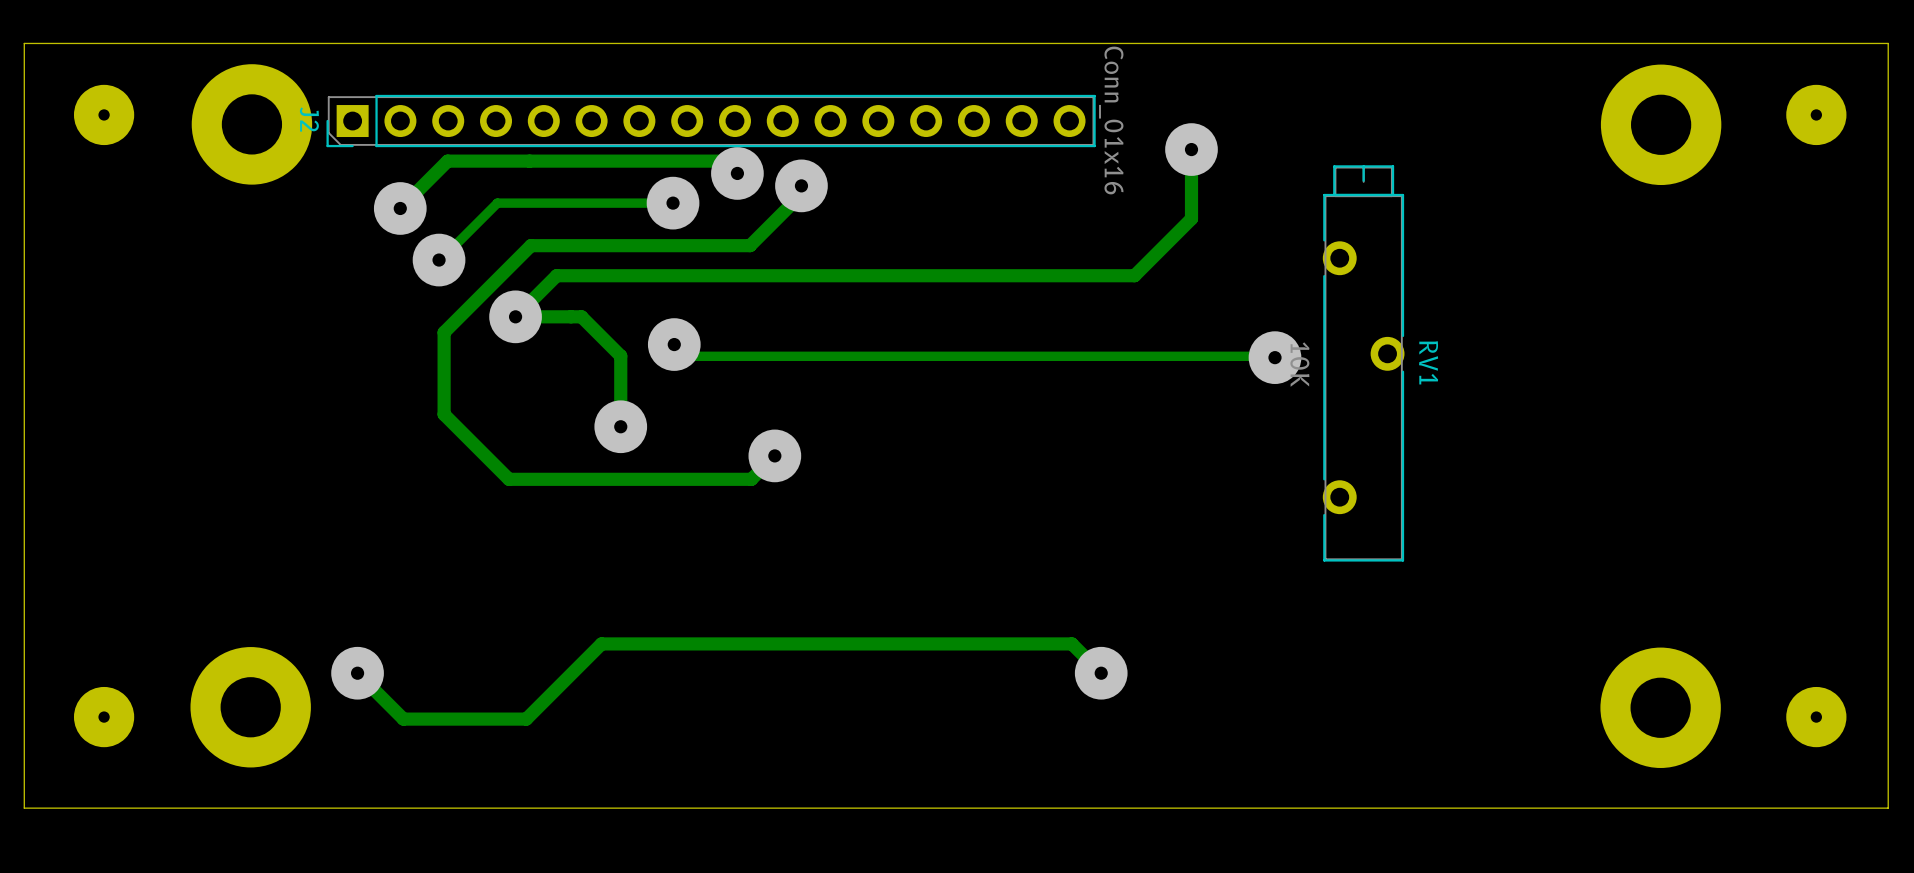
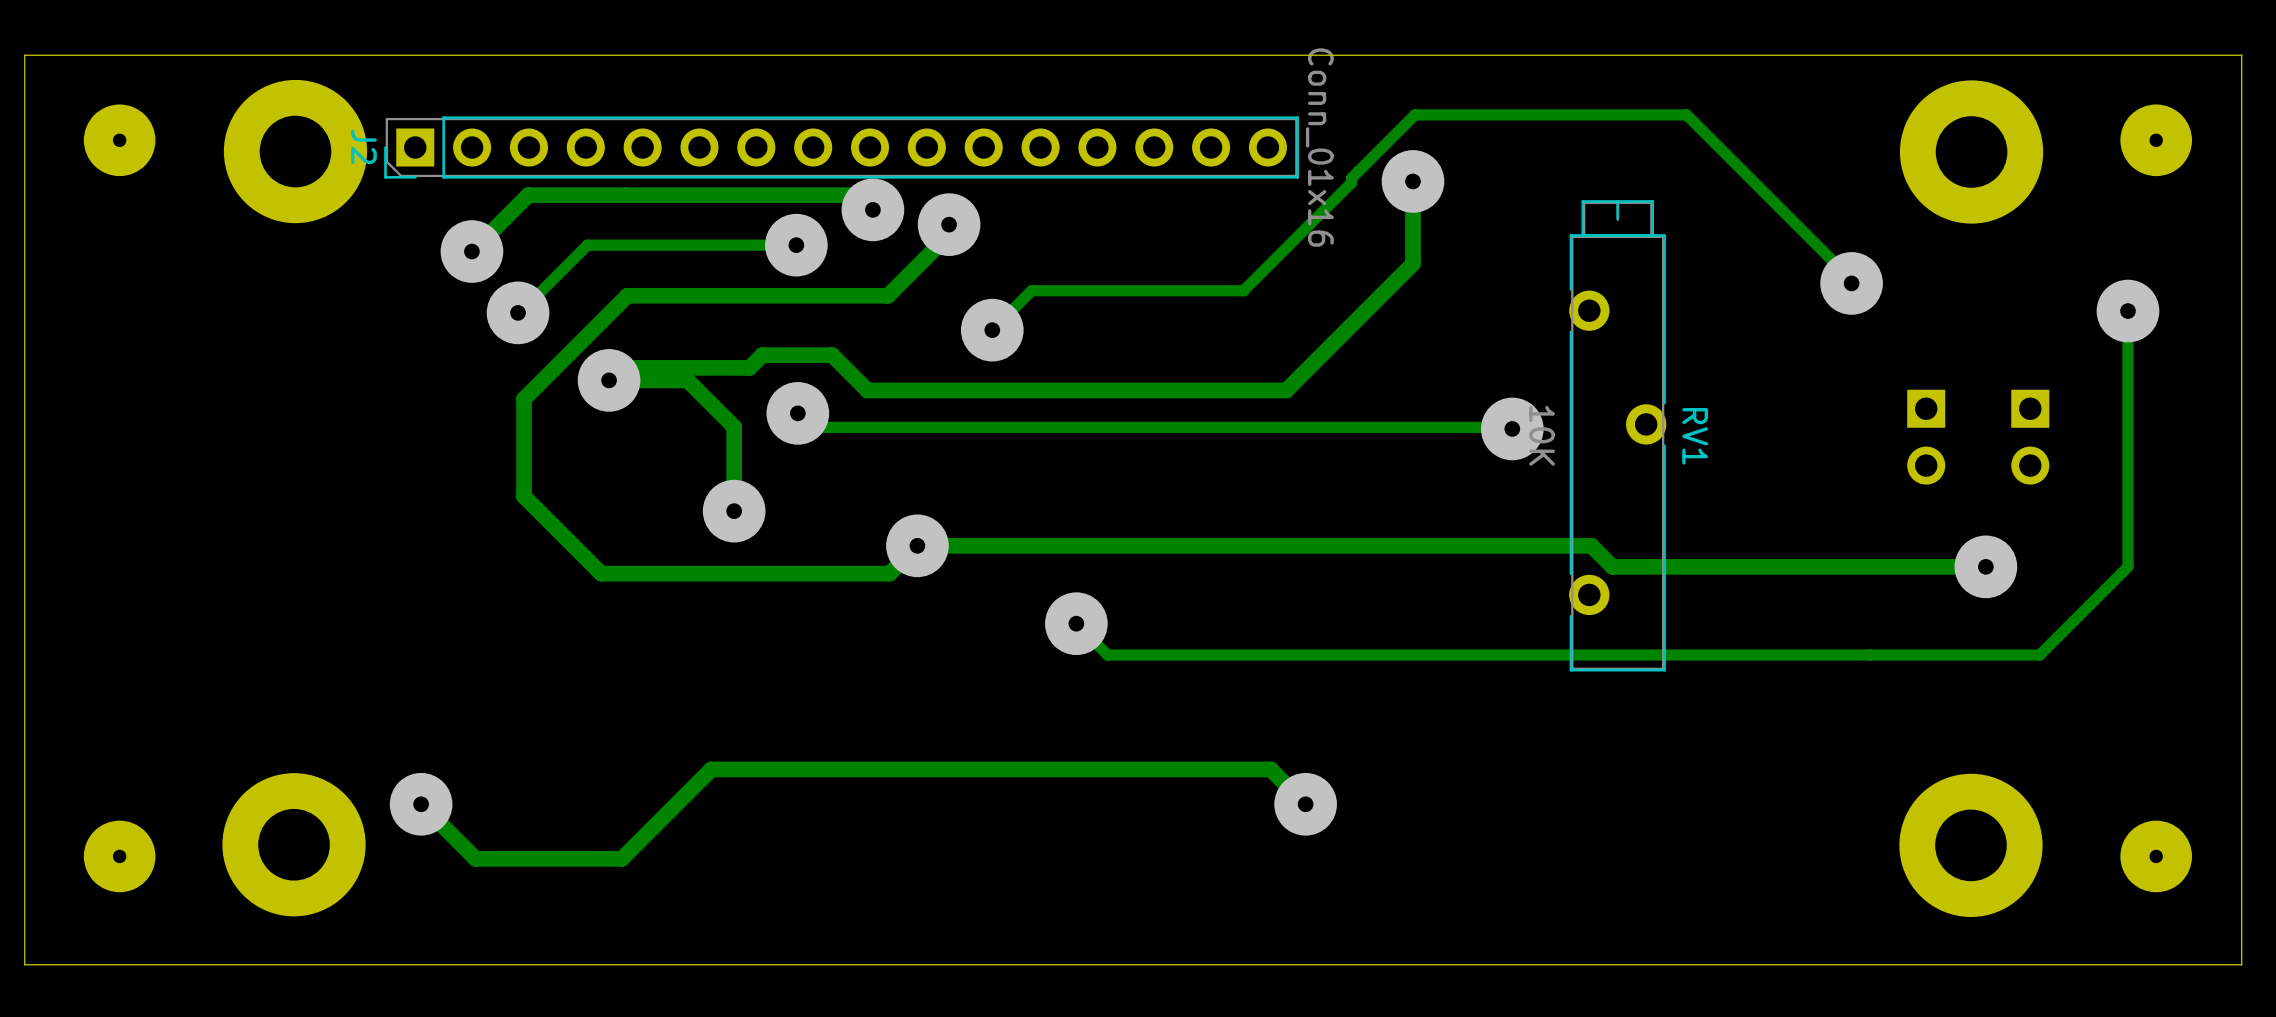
track: none -> (1851, 283) (1851, 279) (1686, 114) (1414, 114) (1351, 178) (1351, 182) (1243, 290) (1031, 290) (992, 330)
via: none -> (1851, 283)
track: none -> (2127, 311) (2127, 566) (2039, 655) (1107, 655) (1076, 623)
via: none -> (2127, 311)
via: none -> (992, 330)
track: (1134, 275) (556, 275) (526, 306) -> (1345, 331) (1286, 390) (867, 390) (832, 355) (762, 355) (749, 367) (621, 367)
part: none -> (1926, 437)
part: none -> (2030, 437)
track: none -> (917, 545) (1591, 545) (1612, 566) (1985, 566)
via: none -> (1985, 566)
via: none -> (1076, 623)

